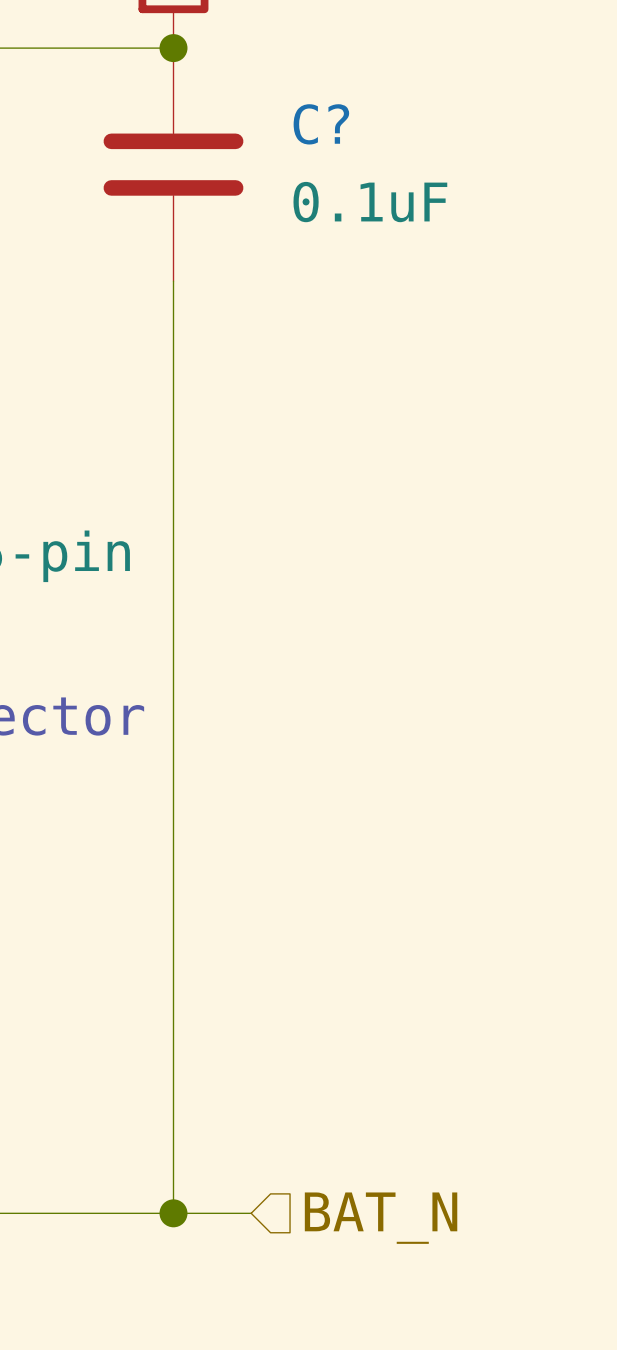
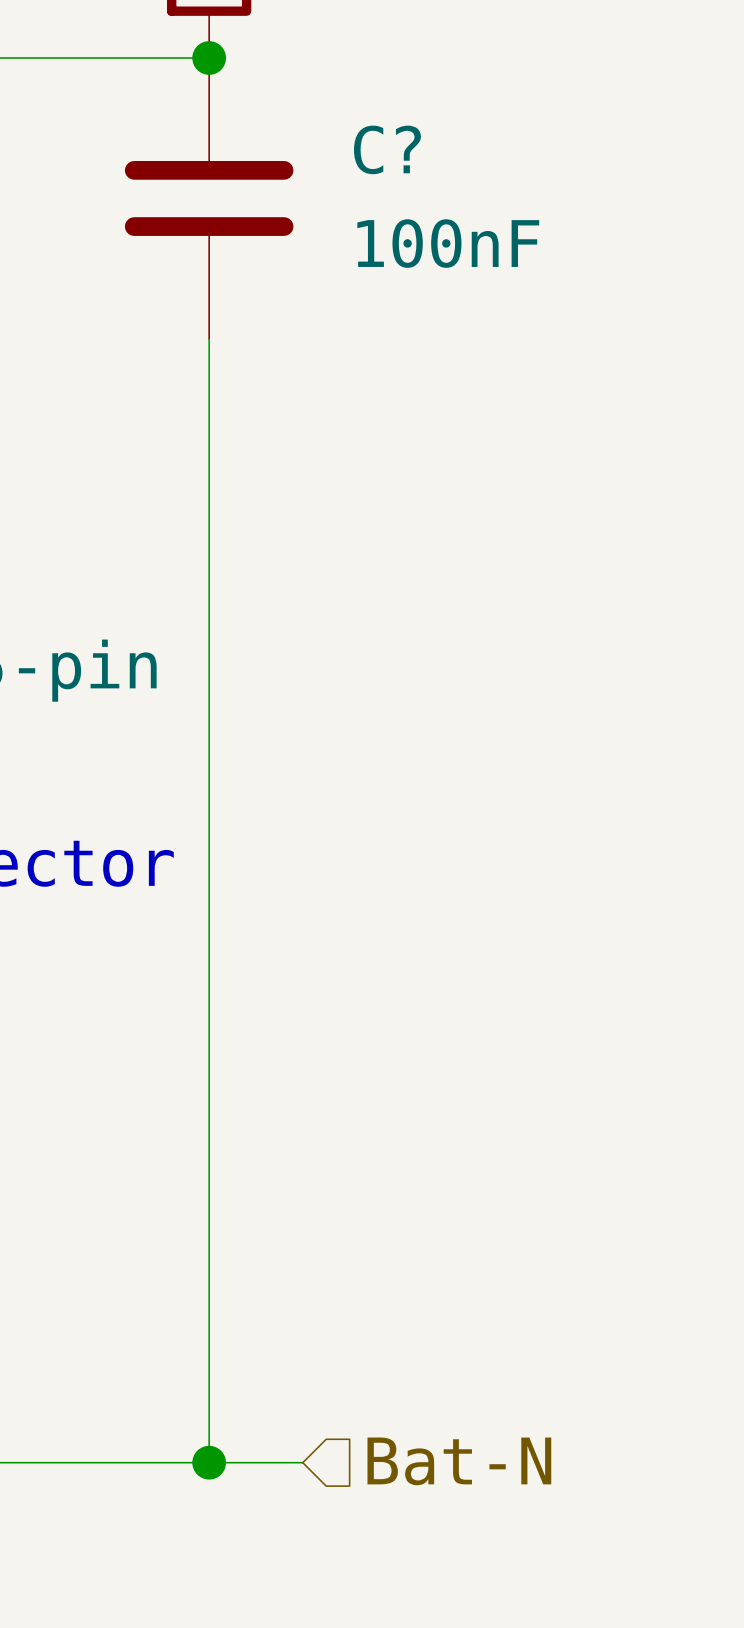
C? value: 0.1uF (370, 202) -> 100nF (448, 243)
hierarchical label: BAT_N (381, 1218) -> Bat-N (459, 1461)

